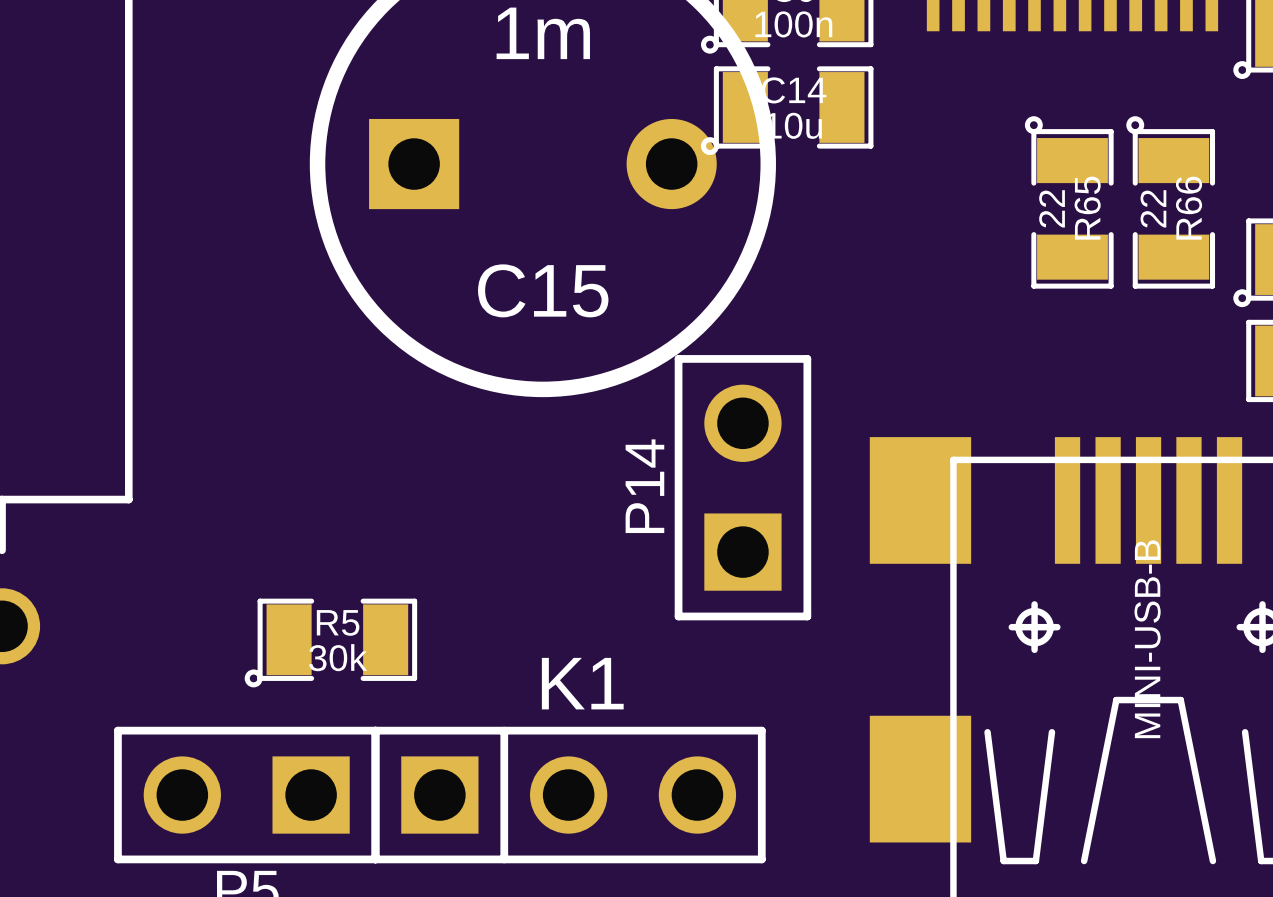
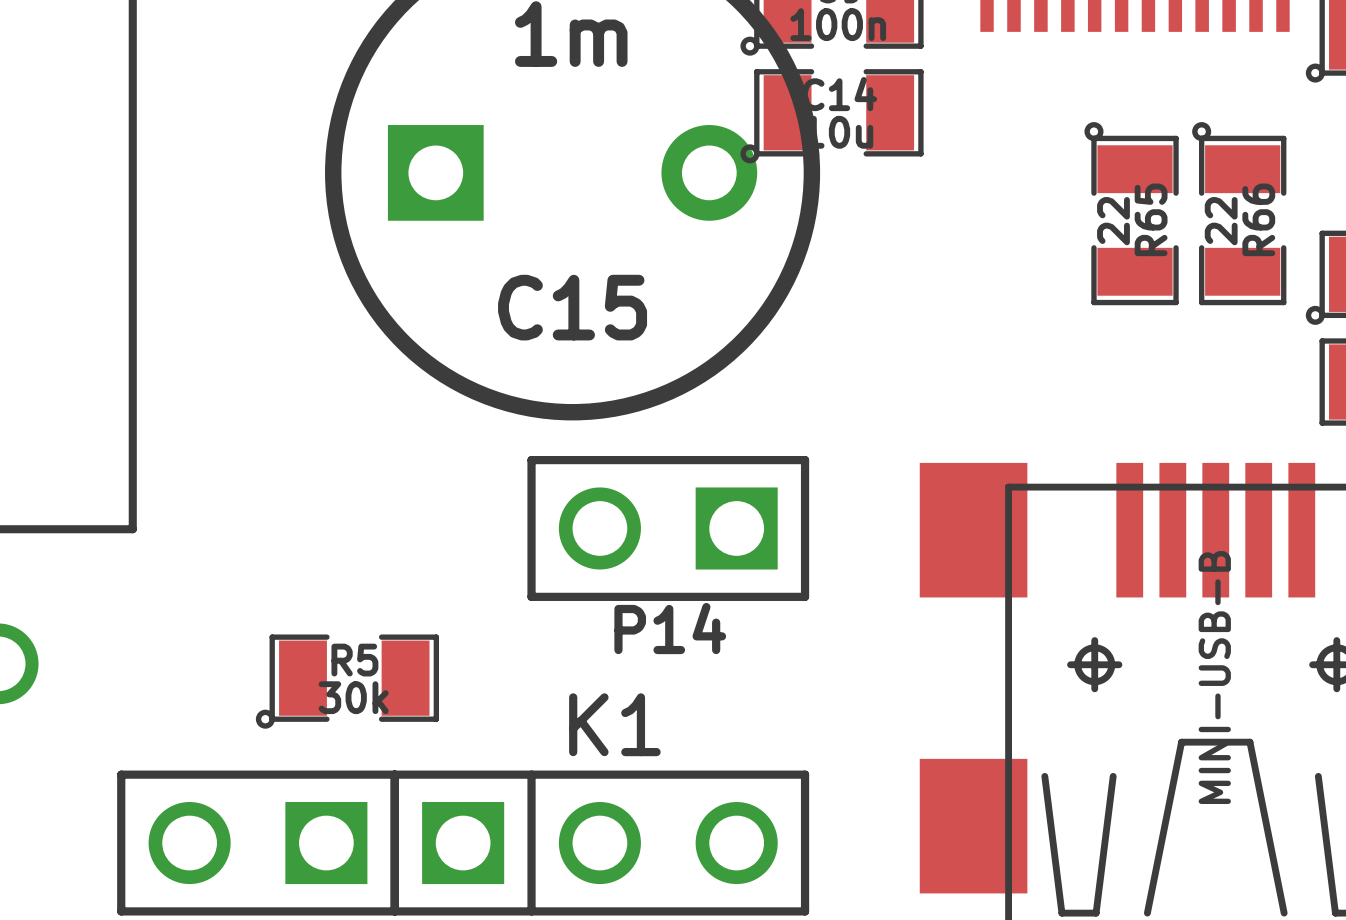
P14 rotation: 0° (742, 487) -> 90° counterclockwise (668, 528)

